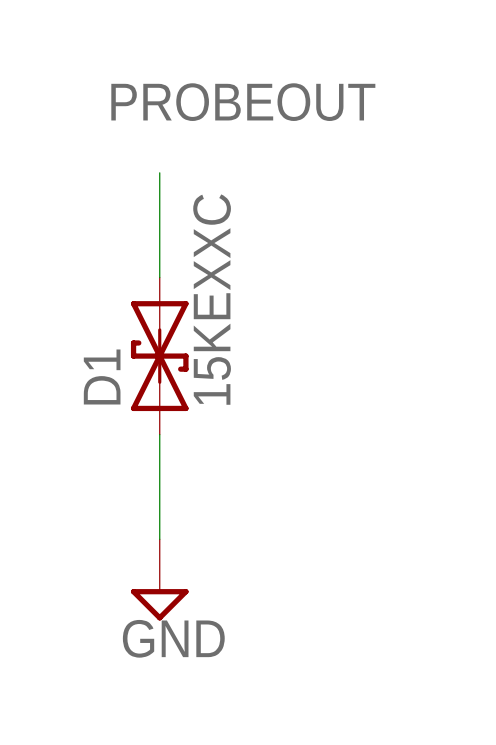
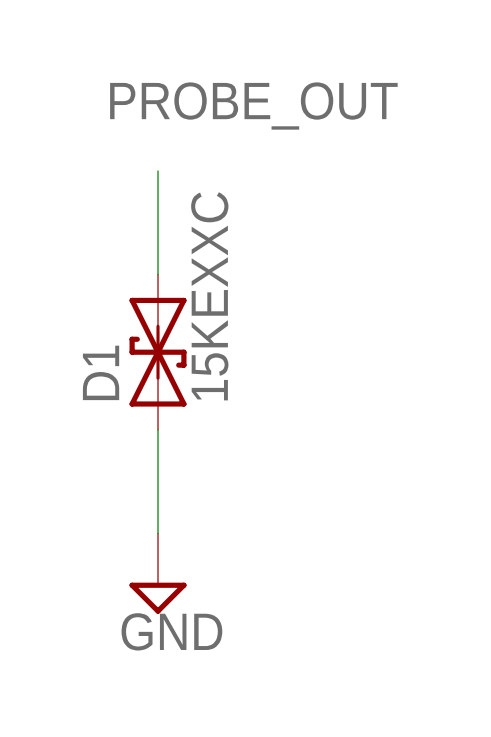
label: PROBEOUT (243, 102) -> PROBE_OUT (253, 106)

